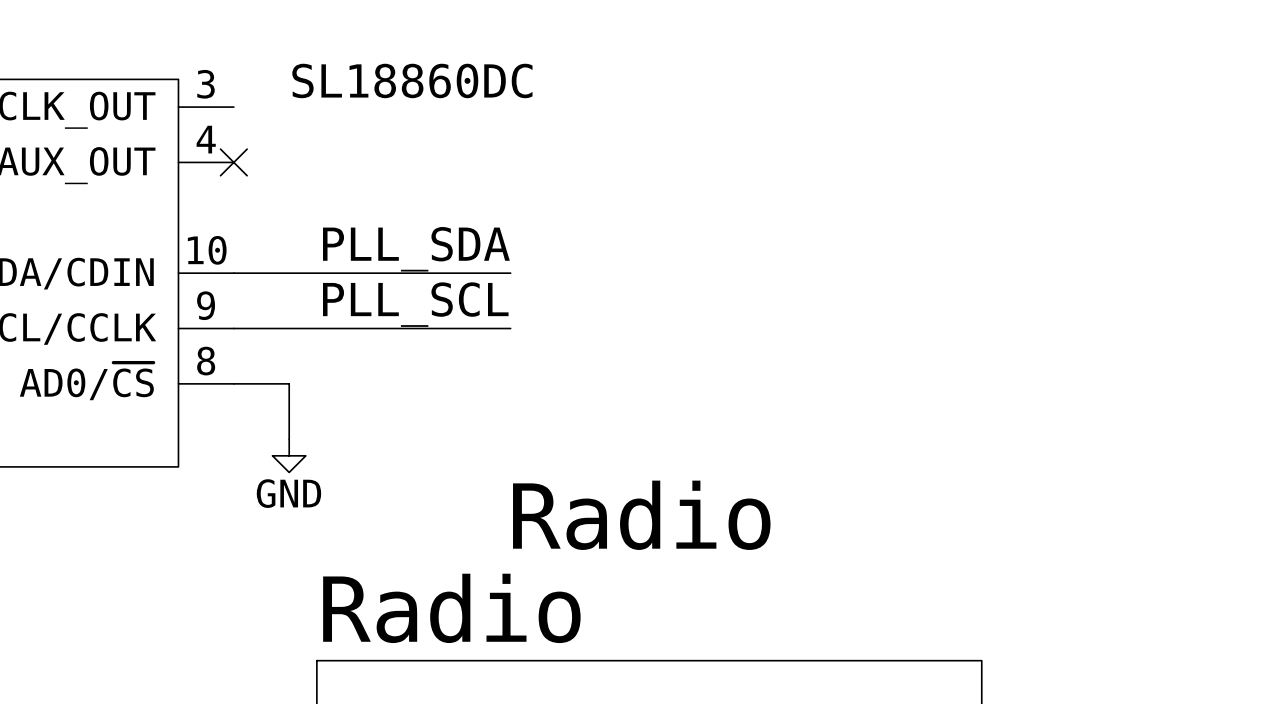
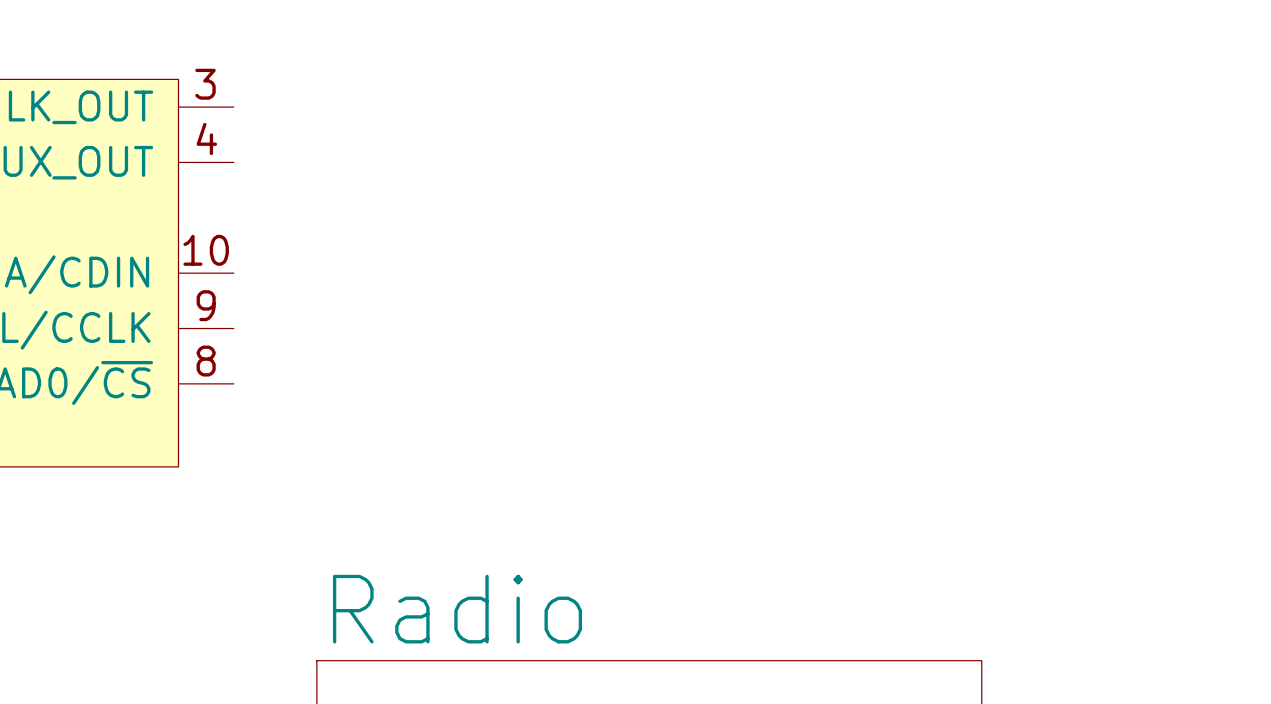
text: SL18860DC (412, 80) -> none
no-connect mark: (233, 162) -> none
label: PLL_SDA (416, 249) -> none
wire: (233, 273) (510, 273) -> none
label: PLL_SCL (415, 304) -> none
wire: (233, 328) (510, 328) -> none
wire: (233, 383) (289, 383) (289, 439) -> none
power symbol: GND (289, 455) -> none
text: Radio (641, 515) -> none

